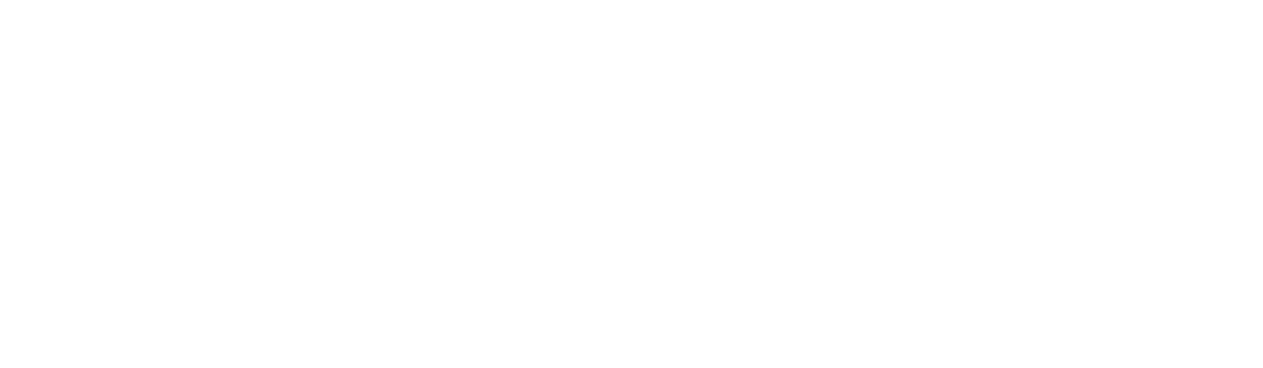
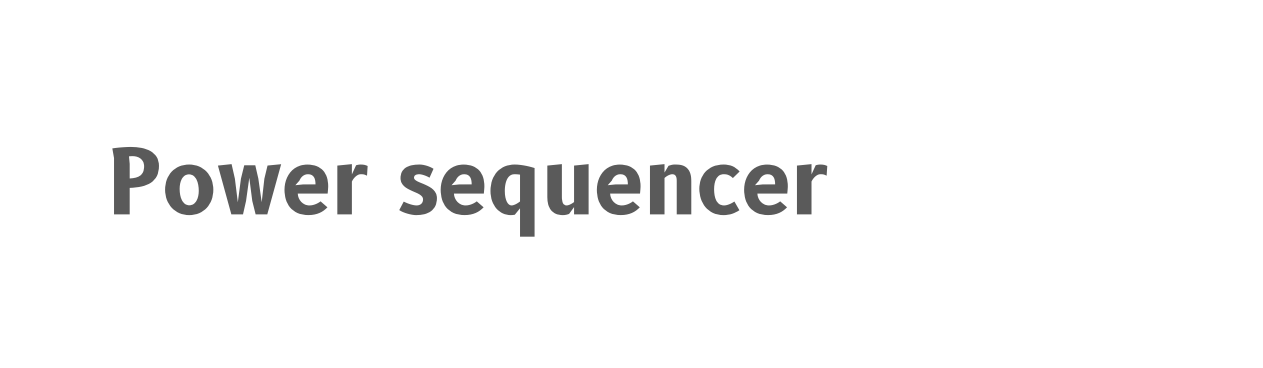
text: none -> Power sequencer (469, 191)

